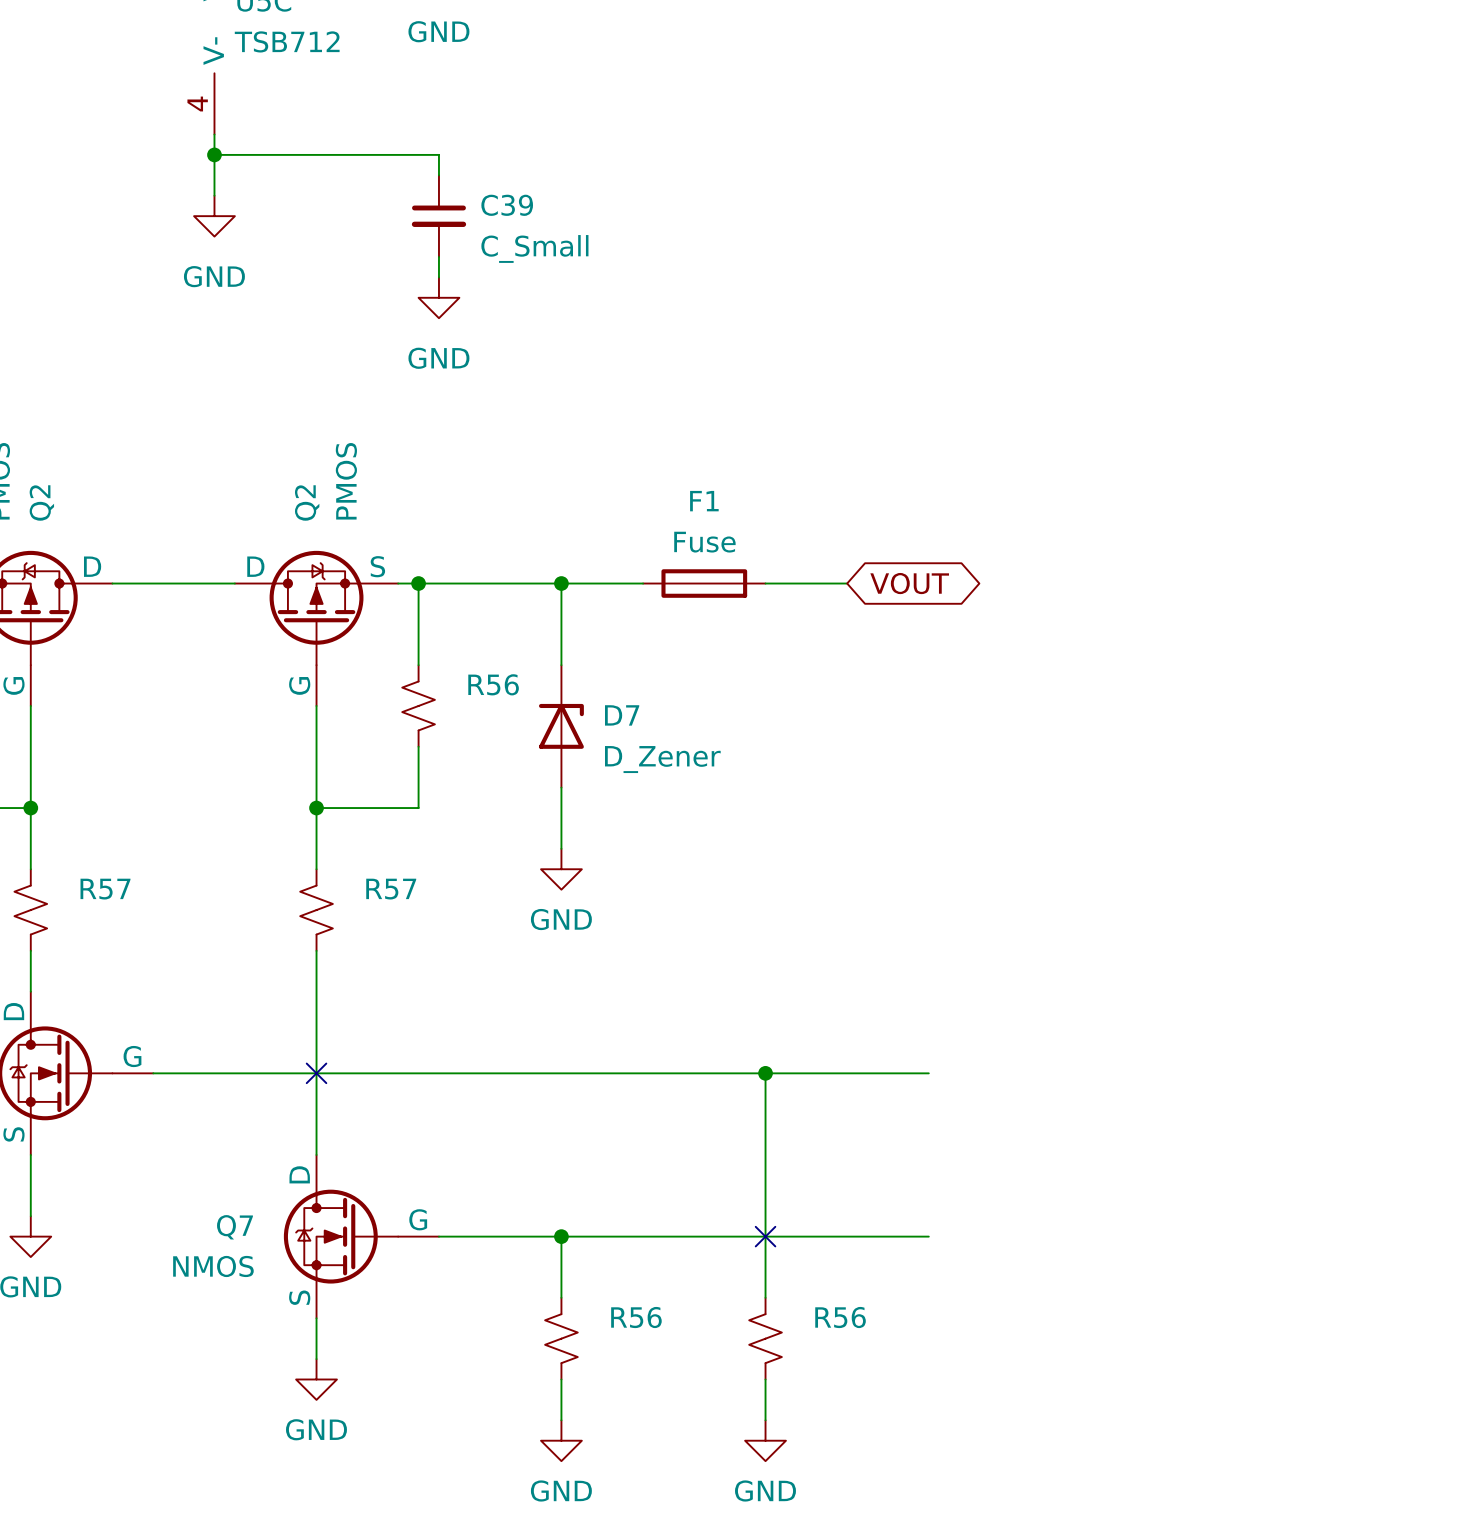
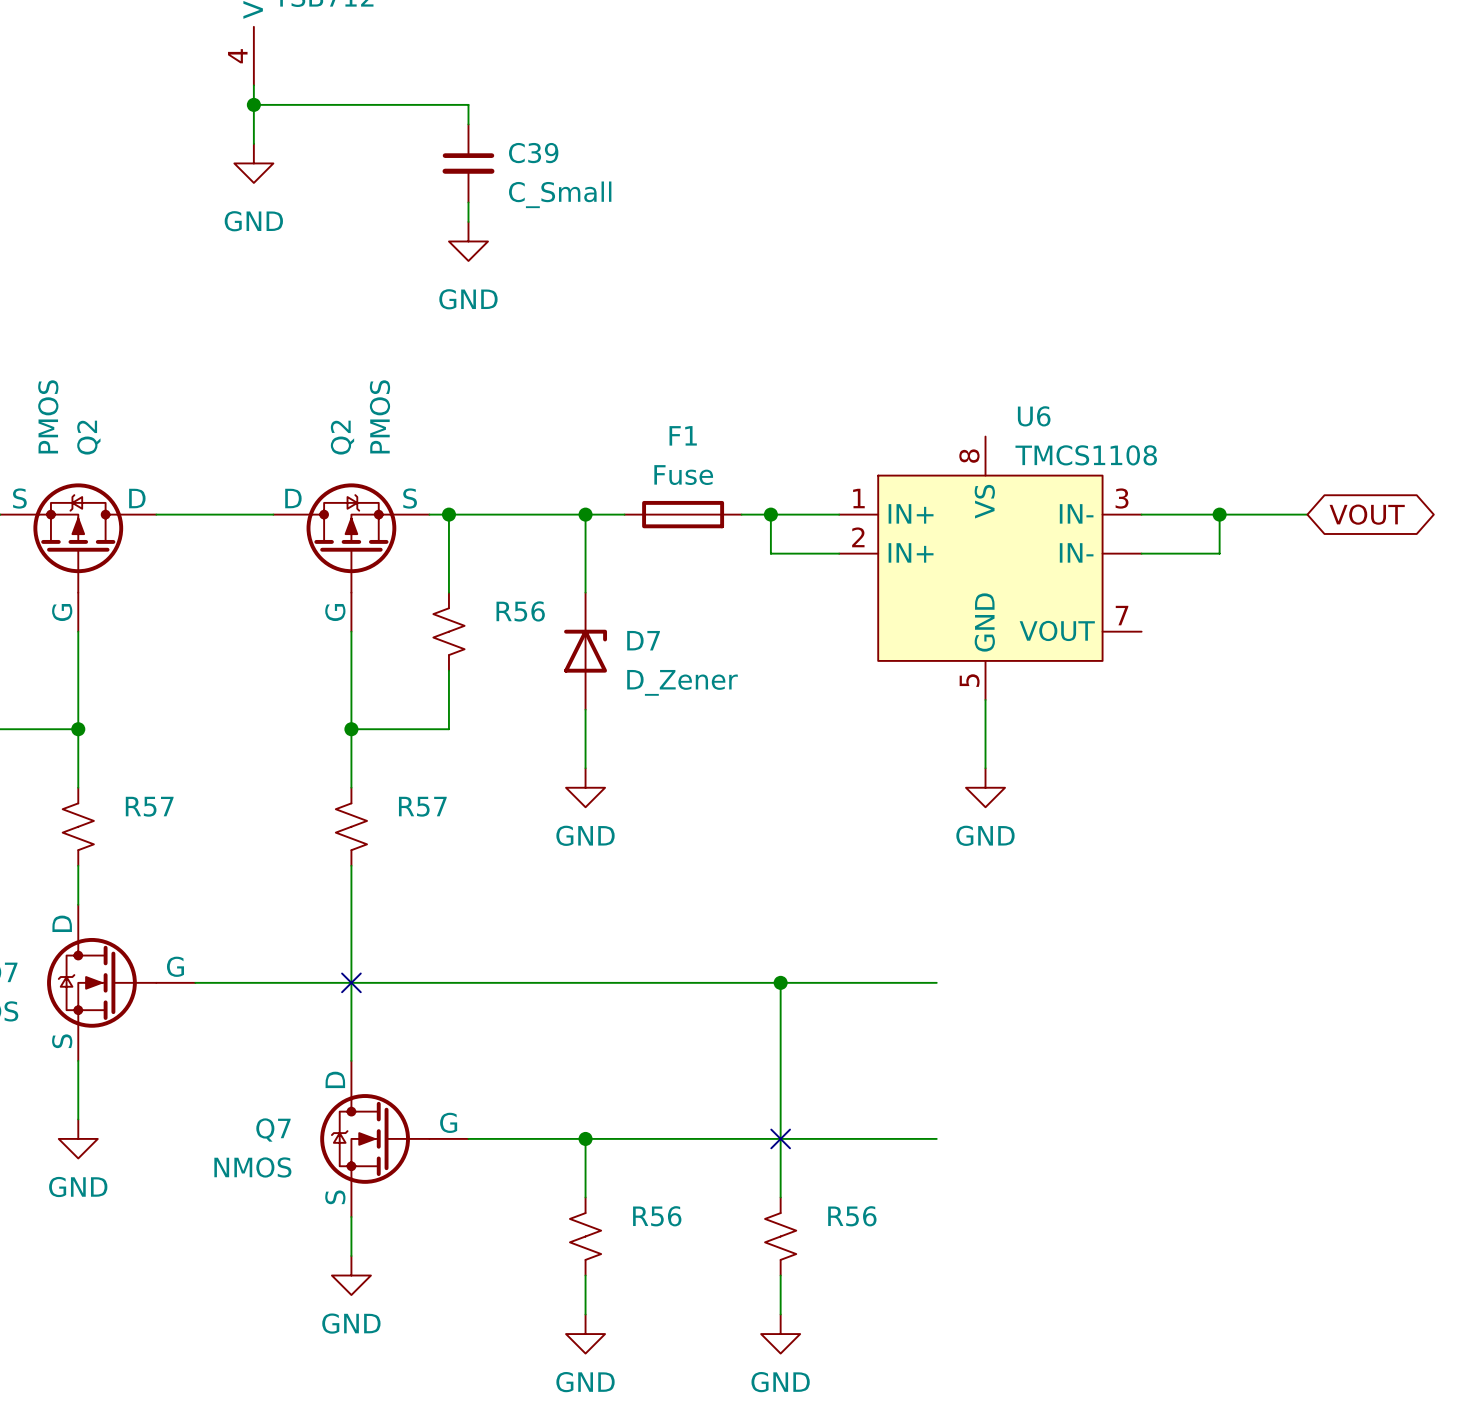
F1 position: (704, 583) -> (683, 514)
wire: none -> (770, 514) (770, 553) (839, 553)
junction: none -> (770, 514)
global label: VOUT (909, 583) -> none
wire: none -> (1141, 514) (1307, 514)
wire: none -> (1219, 514) (1219, 553) (1141, 553)
junction: none -> (1219, 514)
global label: none -> VOUT (1367, 514)
U6: none -> TMCS1108 (990, 568)
wire: none -> (985, 699) (985, 768)
power symbol: none -> GND (985, 787)

